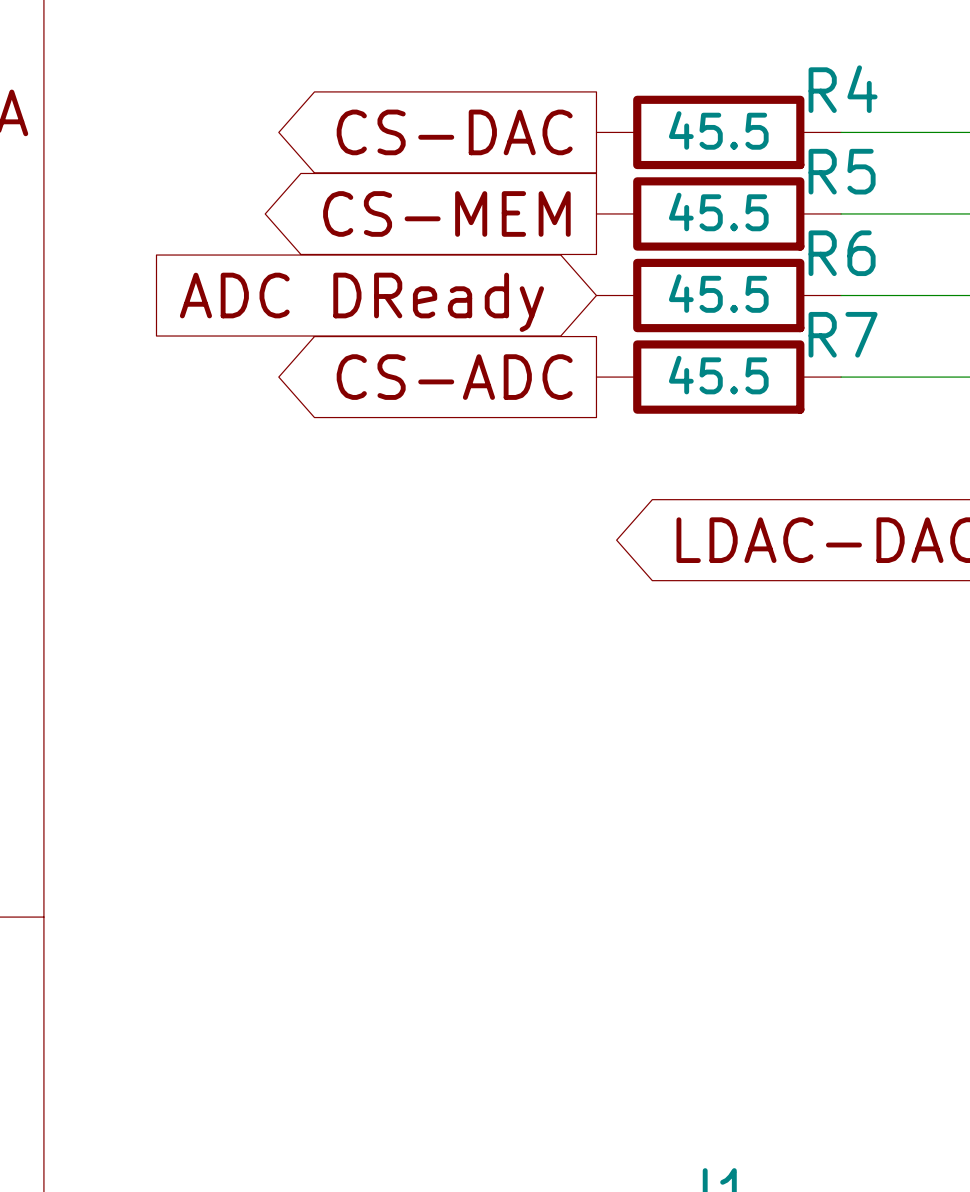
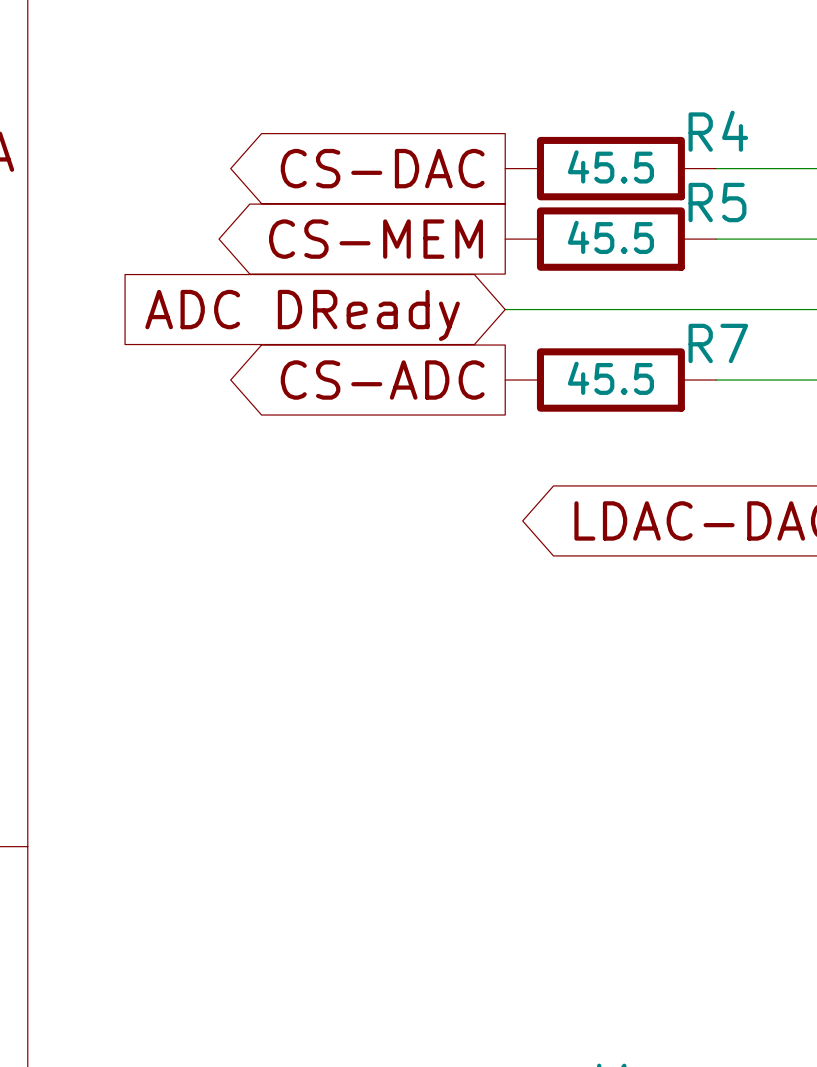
wire: none -> (505, 309) (716, 309)
R6: 45.5 (718, 295) -> none

